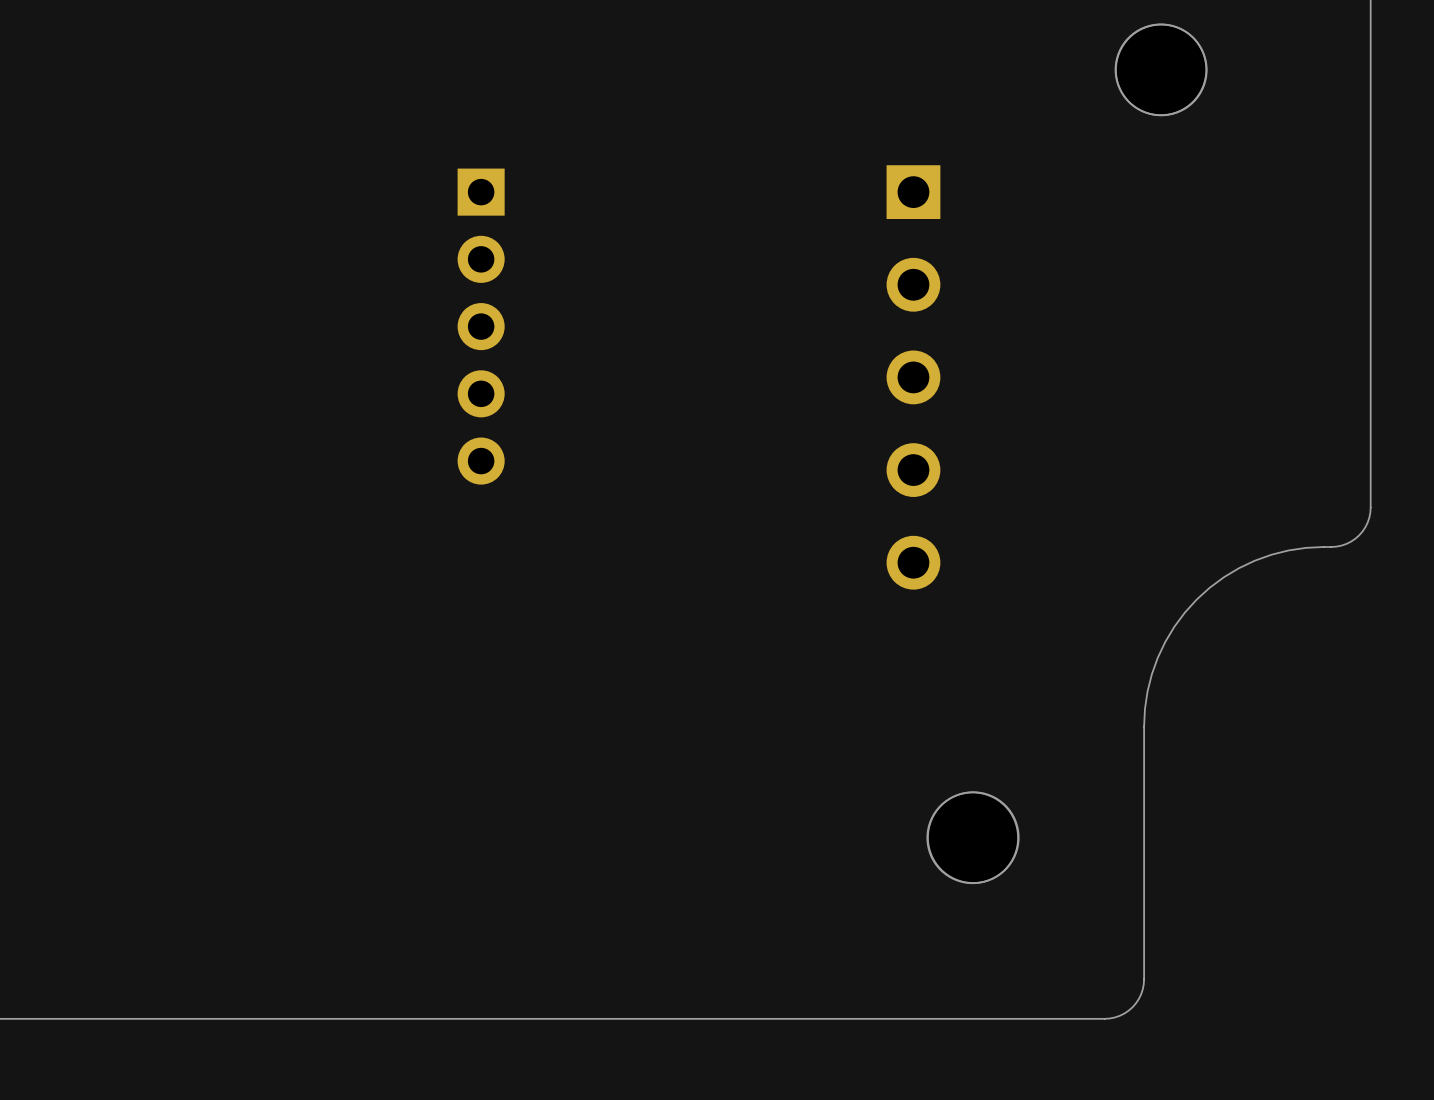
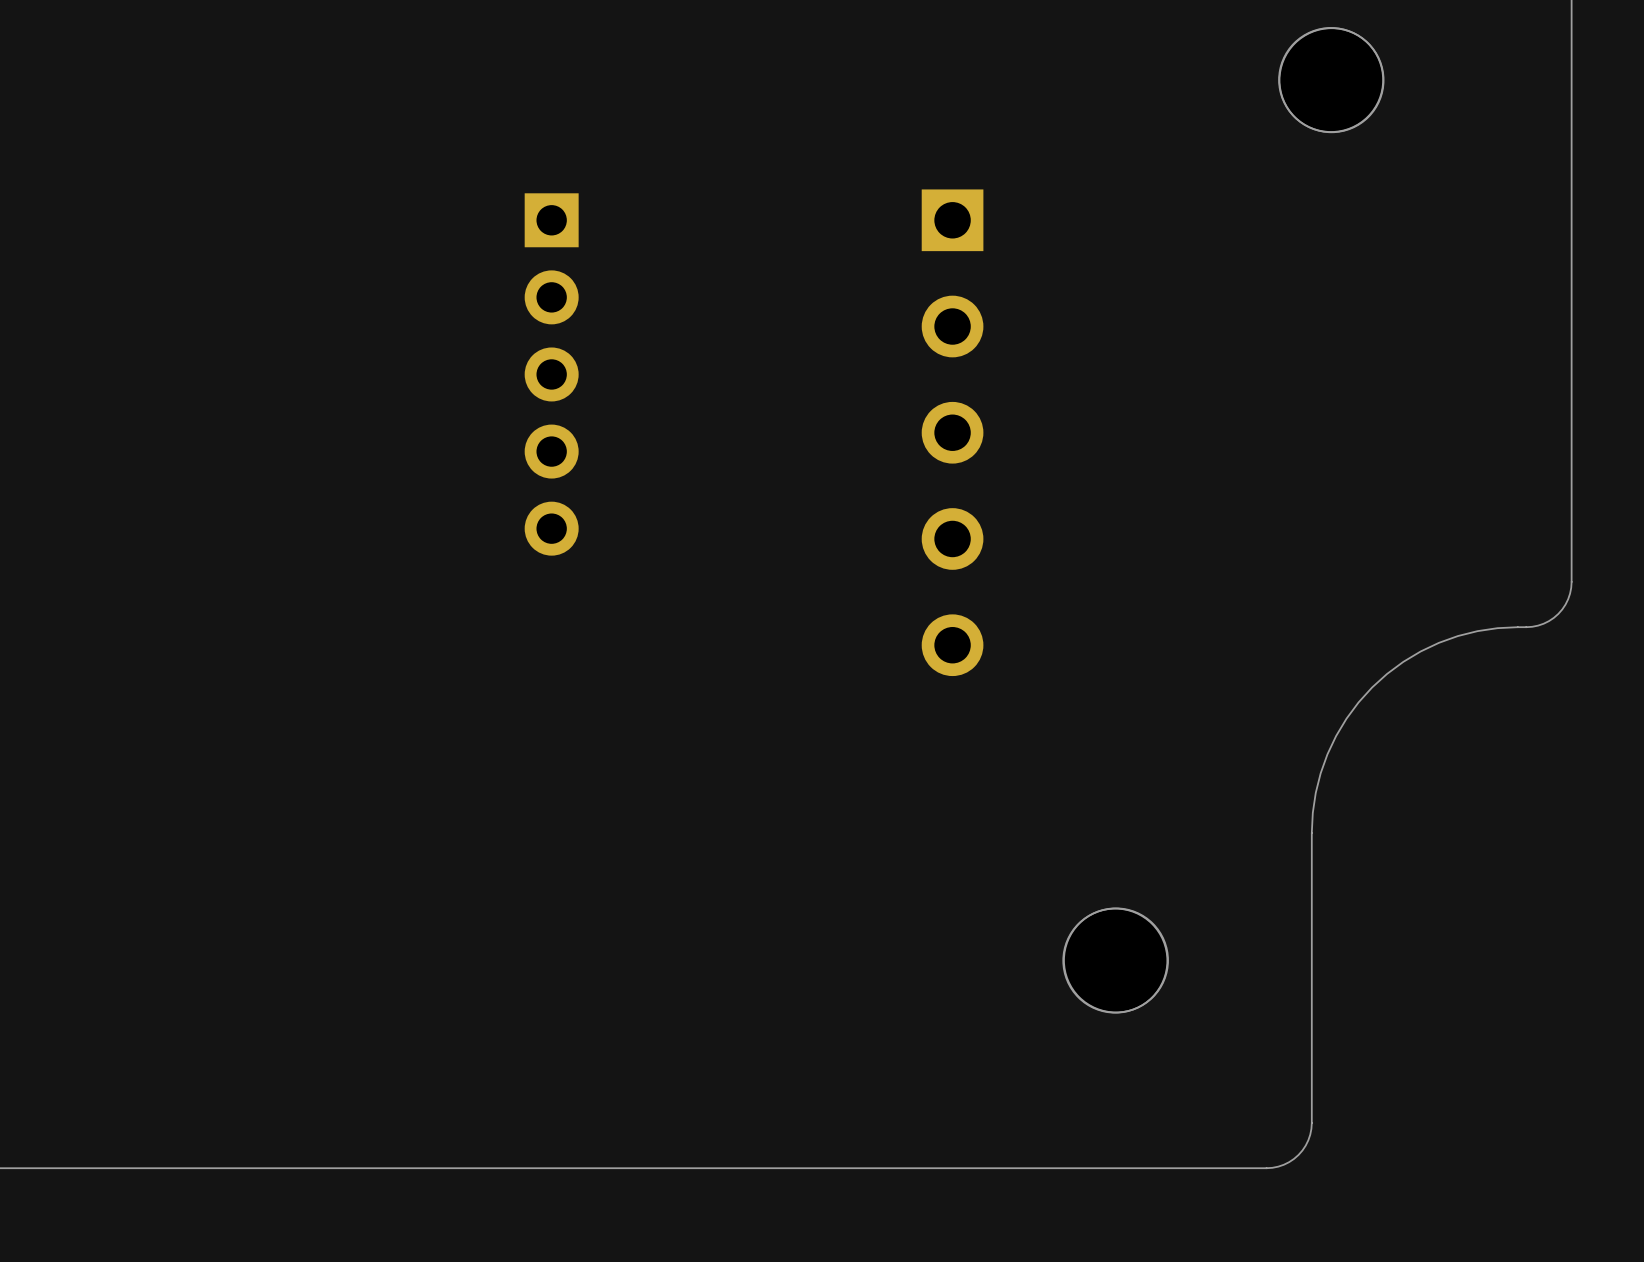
part position: (913, 377) -> (952, 432)

